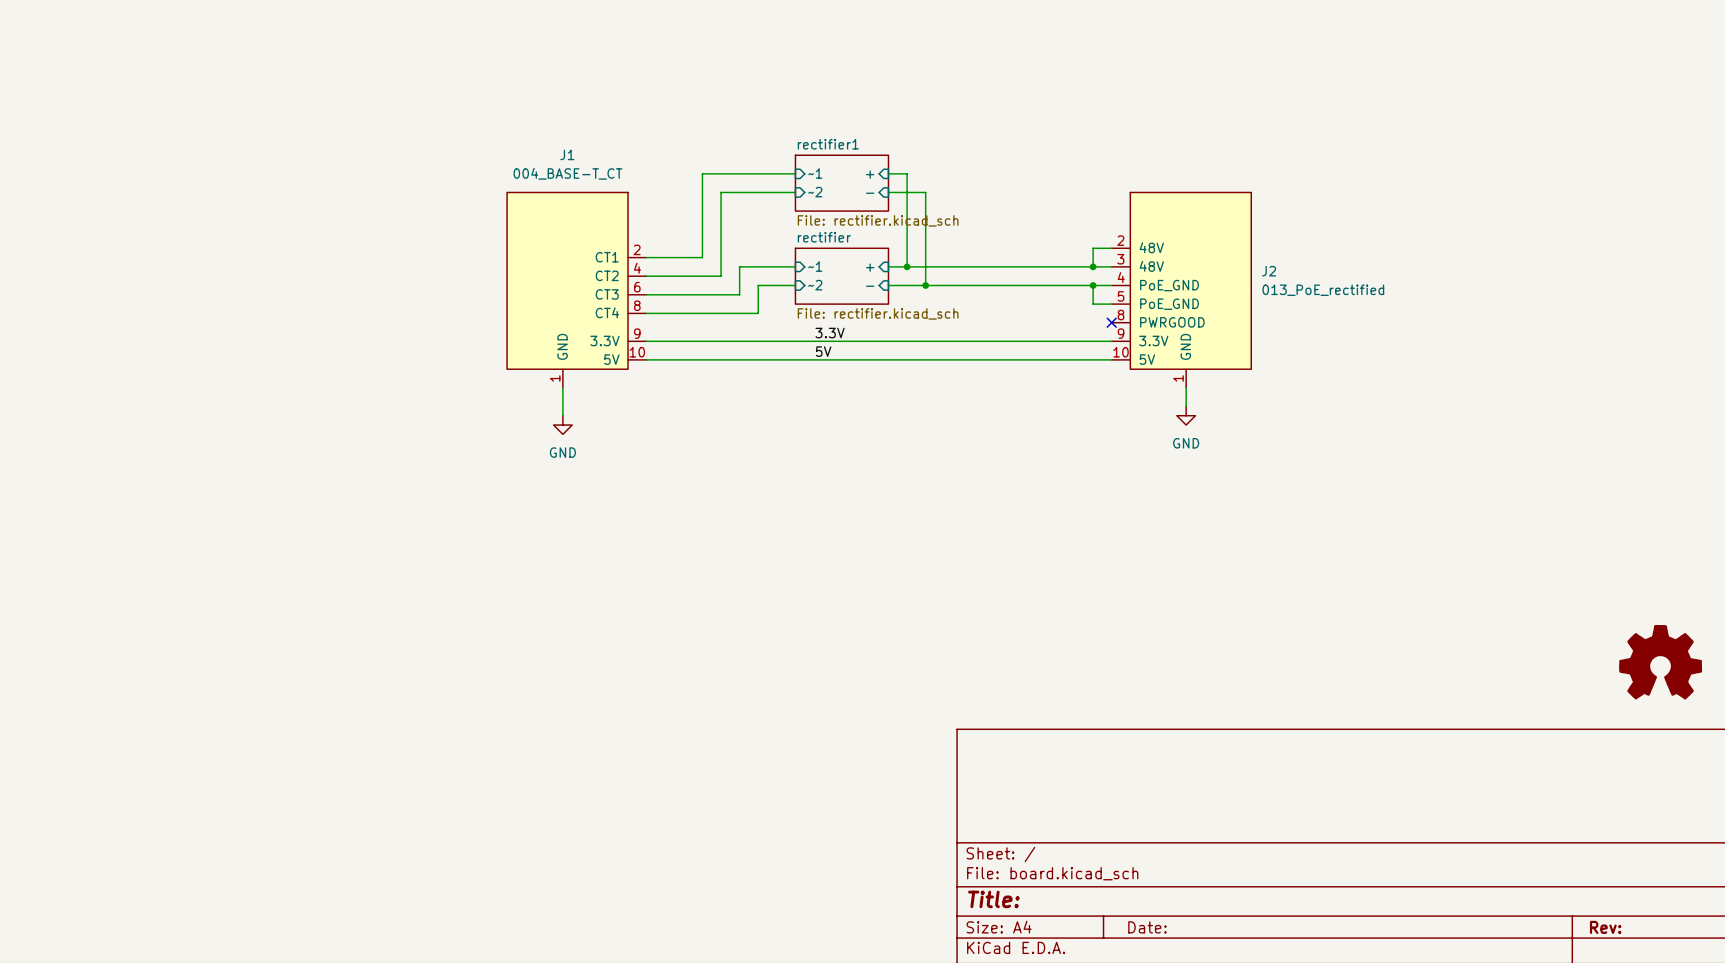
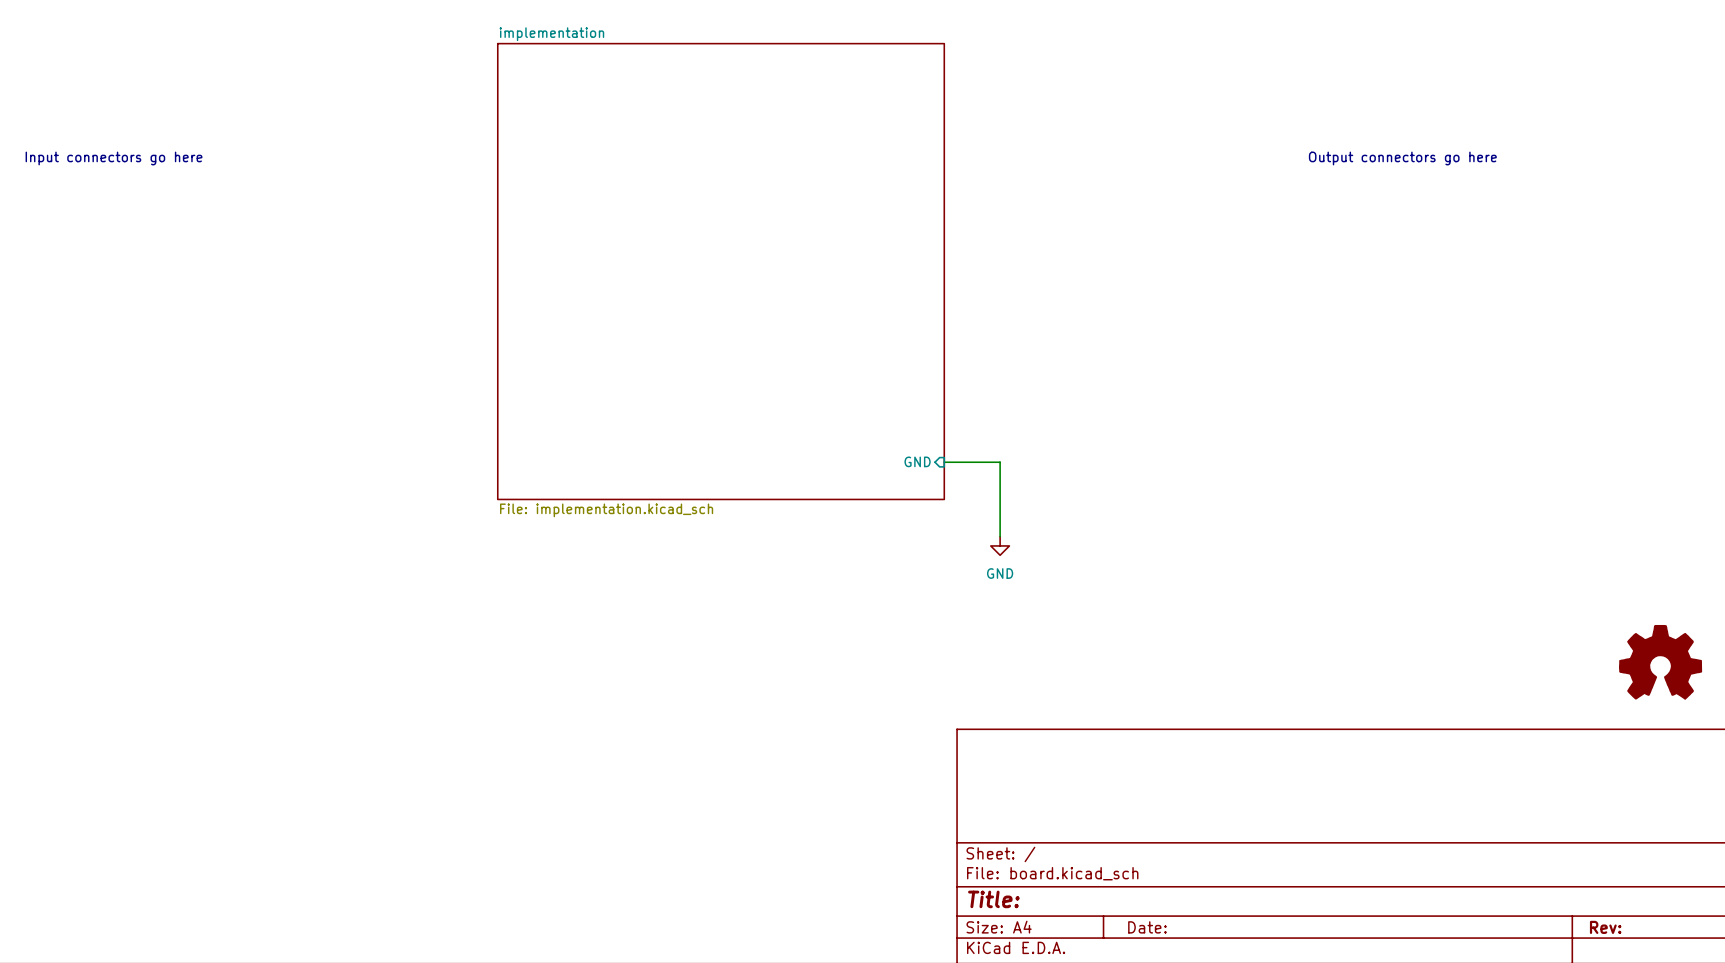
text: none -> Input connectors go here (114, 158)
text: none -> Output connectors go here (1402, 158)
wire: (795, 173) (702, 173) (702, 257) (646, 257) -> none
sheet pin: ~1 (815, 173) -> none
wire: (888, 173) (907, 173) (907, 266) -> none
sheet pin: + (870, 174) -> none
sheet rectifier1: File: rectifier.kicad_sch (841, 183) -> none
wire: (795, 192) (721, 192) (721, 276) (646, 276) -> none
sheet pin: ~2 (815, 192) -> none
wire: (888, 192) (925, 192) (925, 285) -> none
sheet pin: - (870, 193) -> none
wire: (1111, 248) (1093, 248) (1093, 266) -> none
wire: (795, 266) (739, 266) (739, 294) (646, 294) -> none
sheet pin: ~1 (815, 266) -> none
wire: (888, 266) (1111, 266) -> none
junction: (907, 266) -> none
junction: (1093, 266) -> none
sheet pin: + (870, 267) -> none
sheet implementation: none -> File: implementation.kicad_sch (721, 271)
sheet rectifier: File: rectifier.kicad_sch (841, 276) -> none
wire: (795, 285) (758, 285) (758, 313) (646, 313) -> none
sheet pin: ~2 (815, 285) -> none
wire: (888, 285) (1111, 285) -> none
junction: (925, 285) -> none
wire: (1093, 285) (1093, 304) (1111, 304) -> none
junction: (1093, 285) -> none
sheet pin: - (870, 286) -> none
J1: 004_BASE-T_CT (576, 290) -> none
J2: 013_PoE_rectified (1181, 290) -> none
no-connect mark: (1111, 322) -> none
label: 3.3V (830, 333) -> none
wire: (646, 341) (1111, 341) -> none
label: 5V (823, 351) -> none
wire: (646, 359) (1111, 359) -> none
wire: (562, 387) (562, 415) -> none
wire: (1186, 387) (1186, 406) -> none
power symbol: GND (1186, 415) -> none
power symbol: GND (562, 425) -> none
sheet pin: none -> GND (917, 461)
wire: none -> (944, 462) (1000, 462) (1000, 536)
power symbol: none -> GND (1000, 545)

